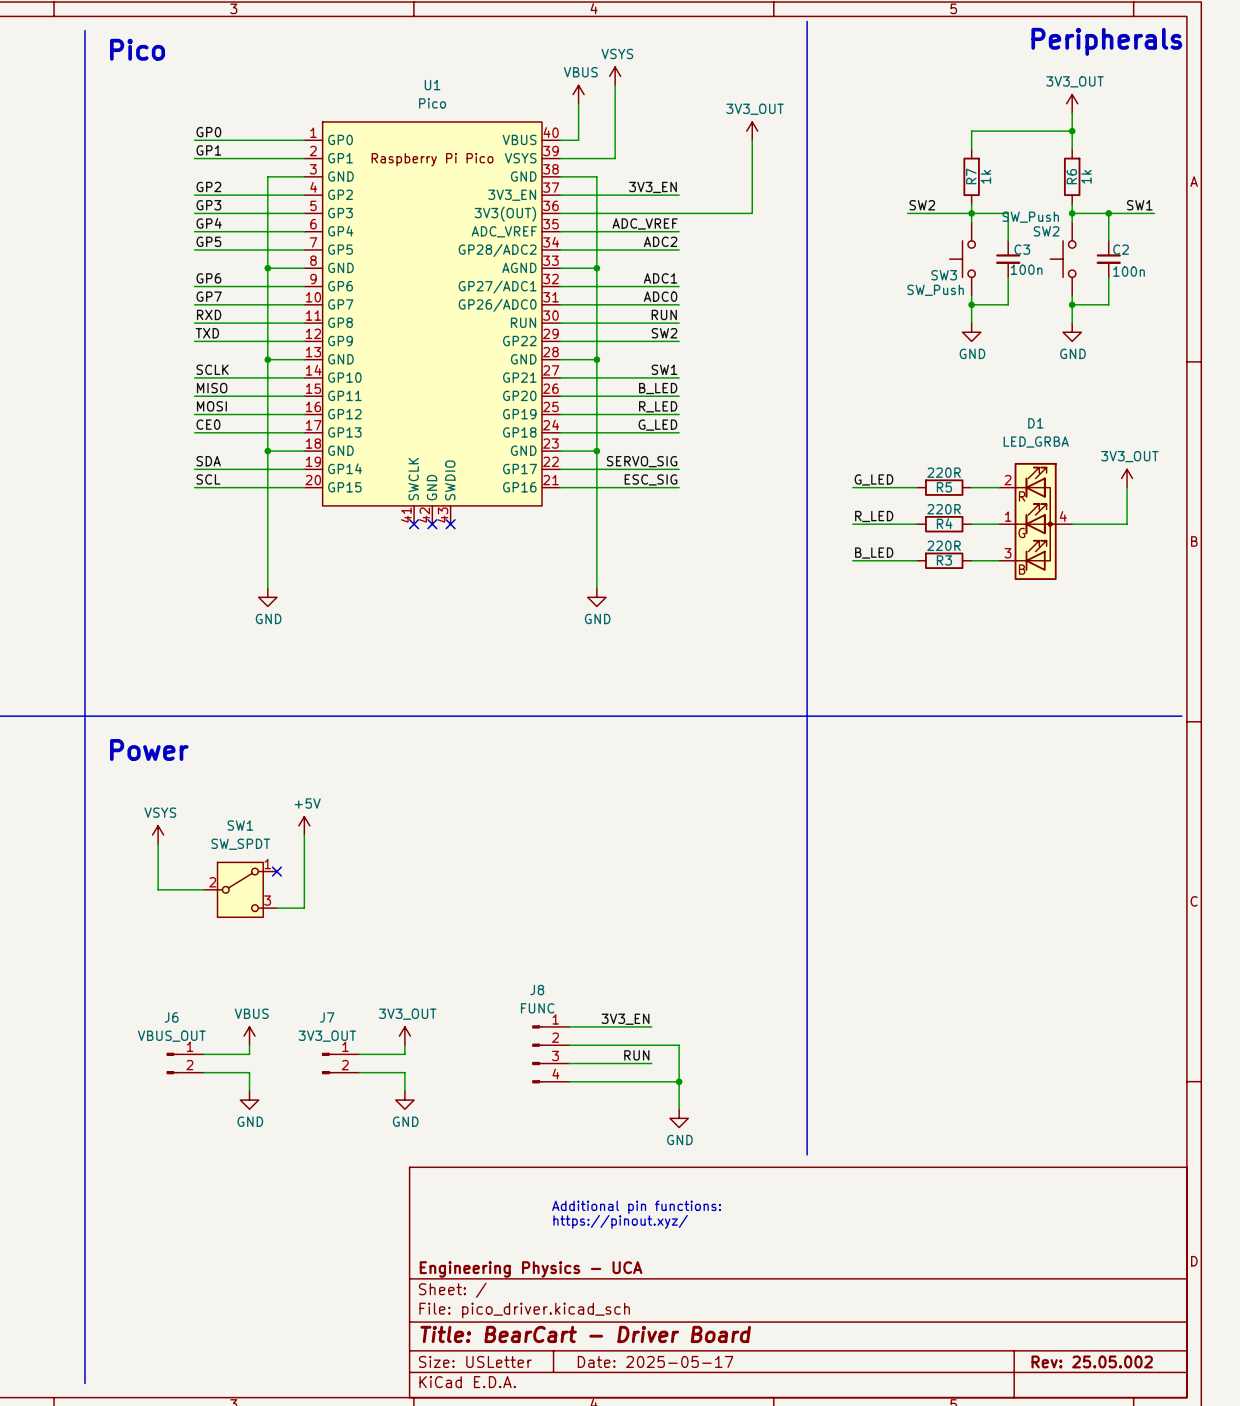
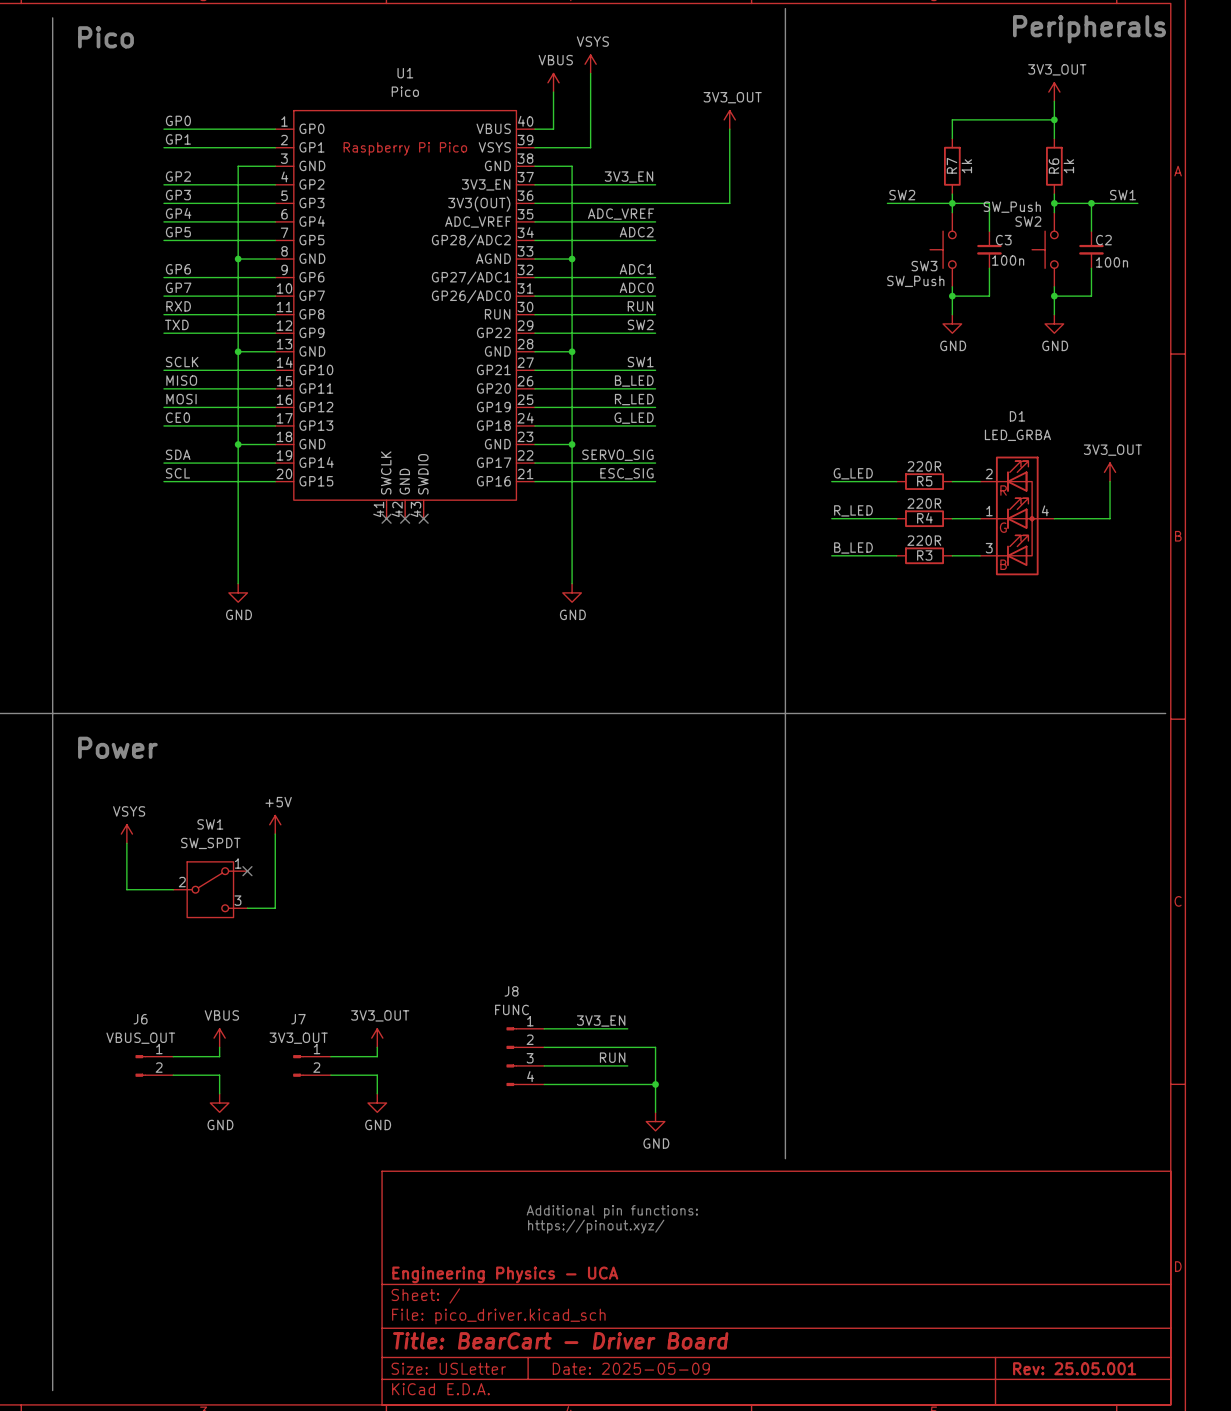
title block: Date: 2025-05-17 (655, 1361) -> Date: 2025-05-09 (631, 1368)
title block: Rev: 25.05.002 (1092, 1361) -> Rev: 25.05.001 (1074, 1368)

